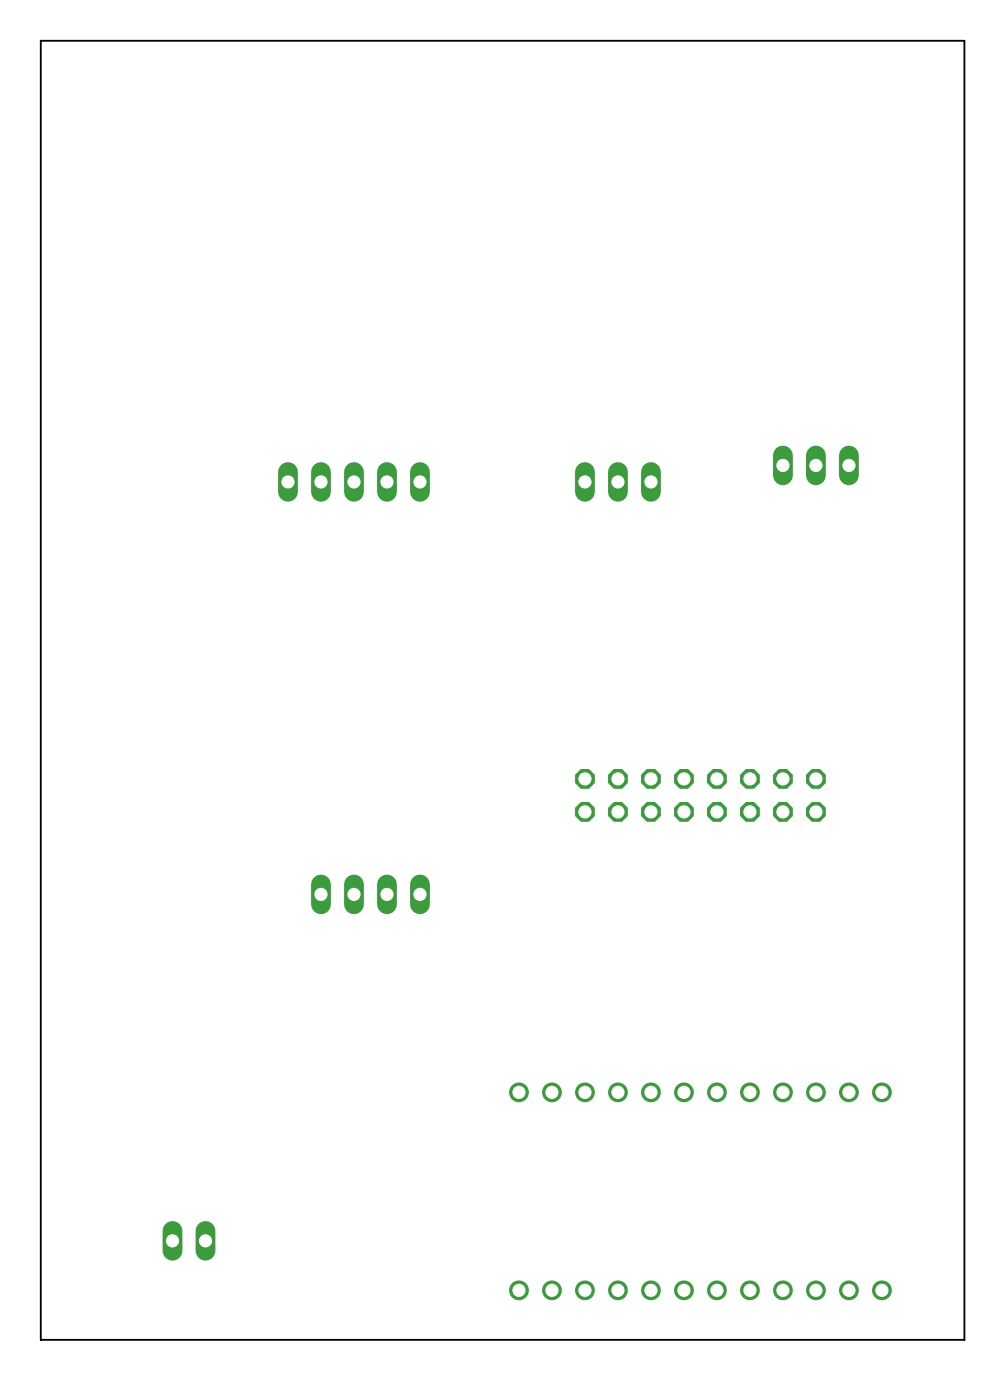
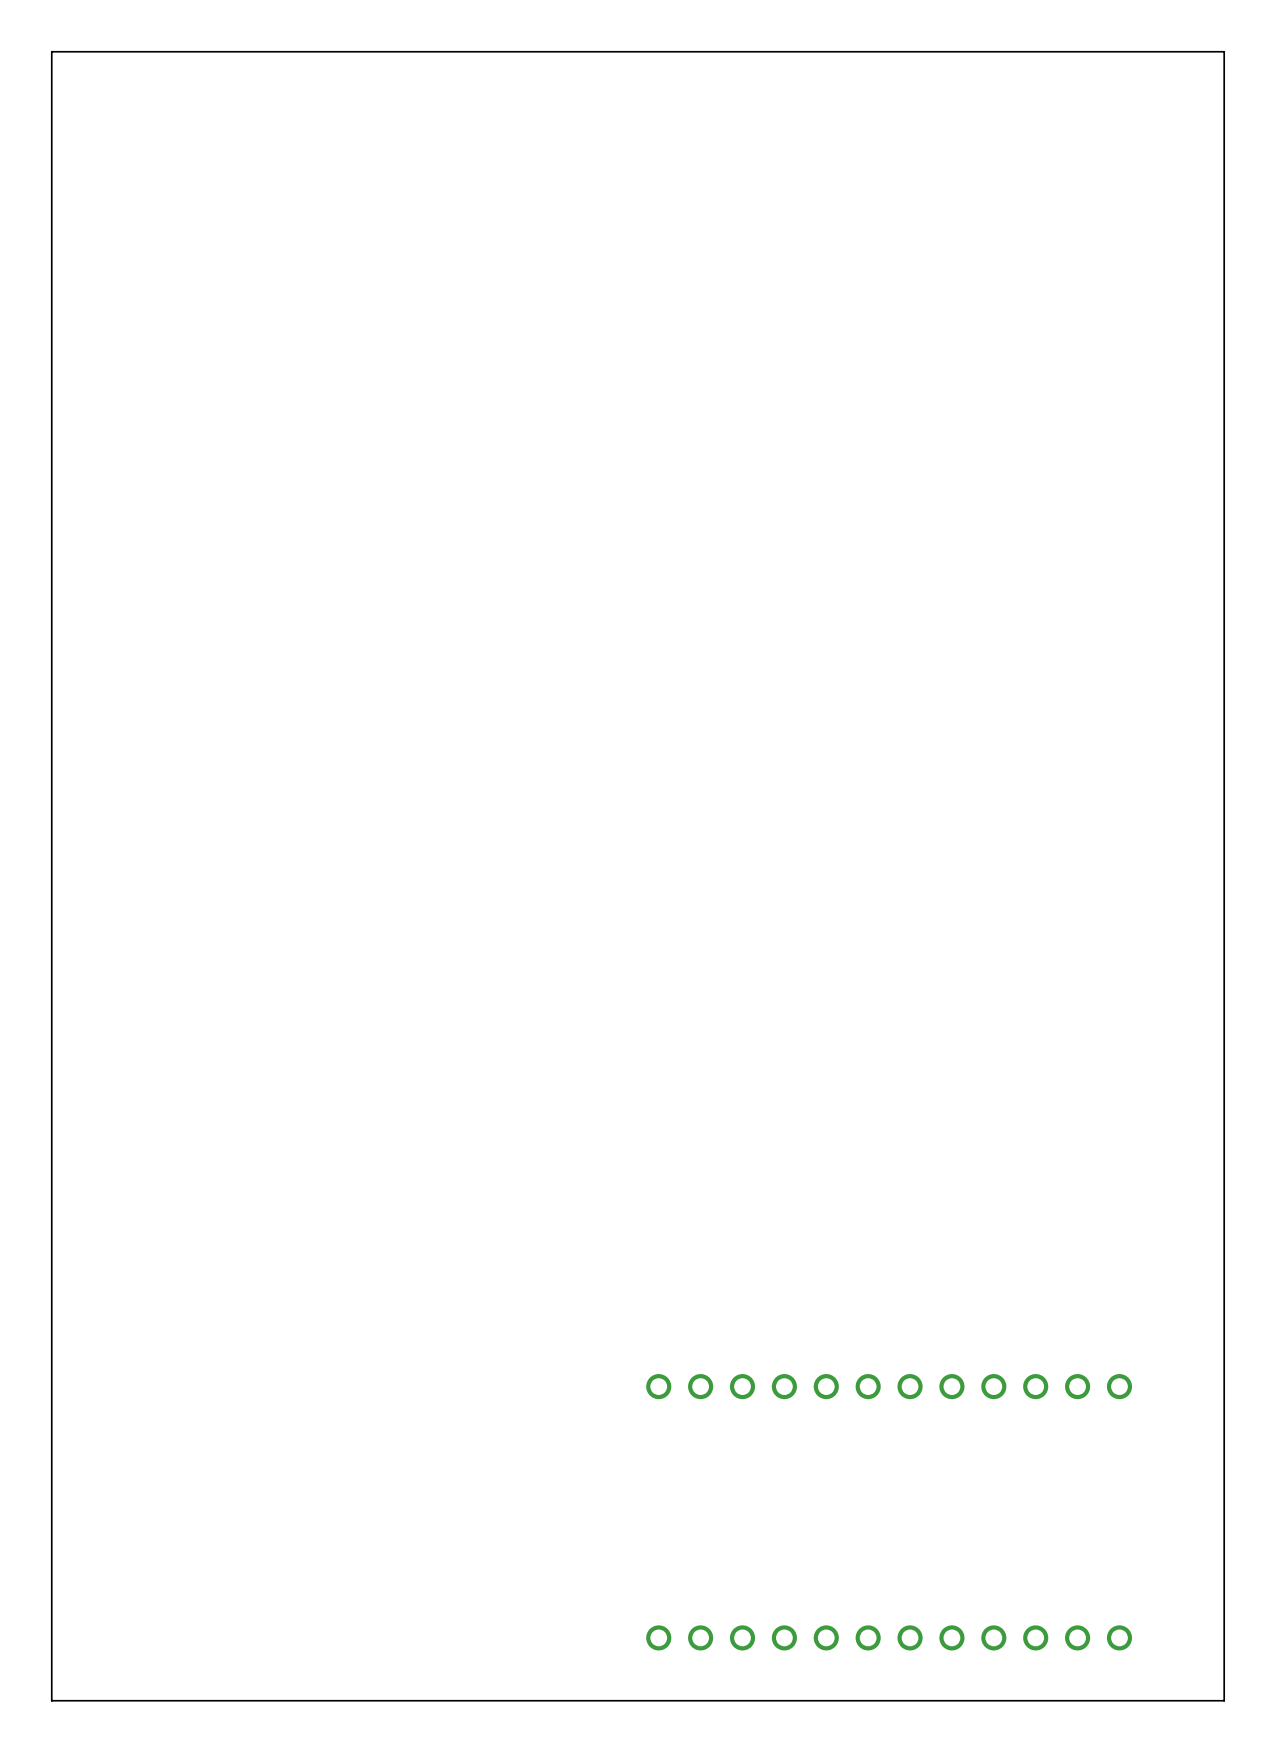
part: (815, 465) -> none
part: (353, 481) -> none
part: (617, 481) -> none
part: (700, 795) -> none
part: (370, 894) -> none
part: (188, 1240) -> none

